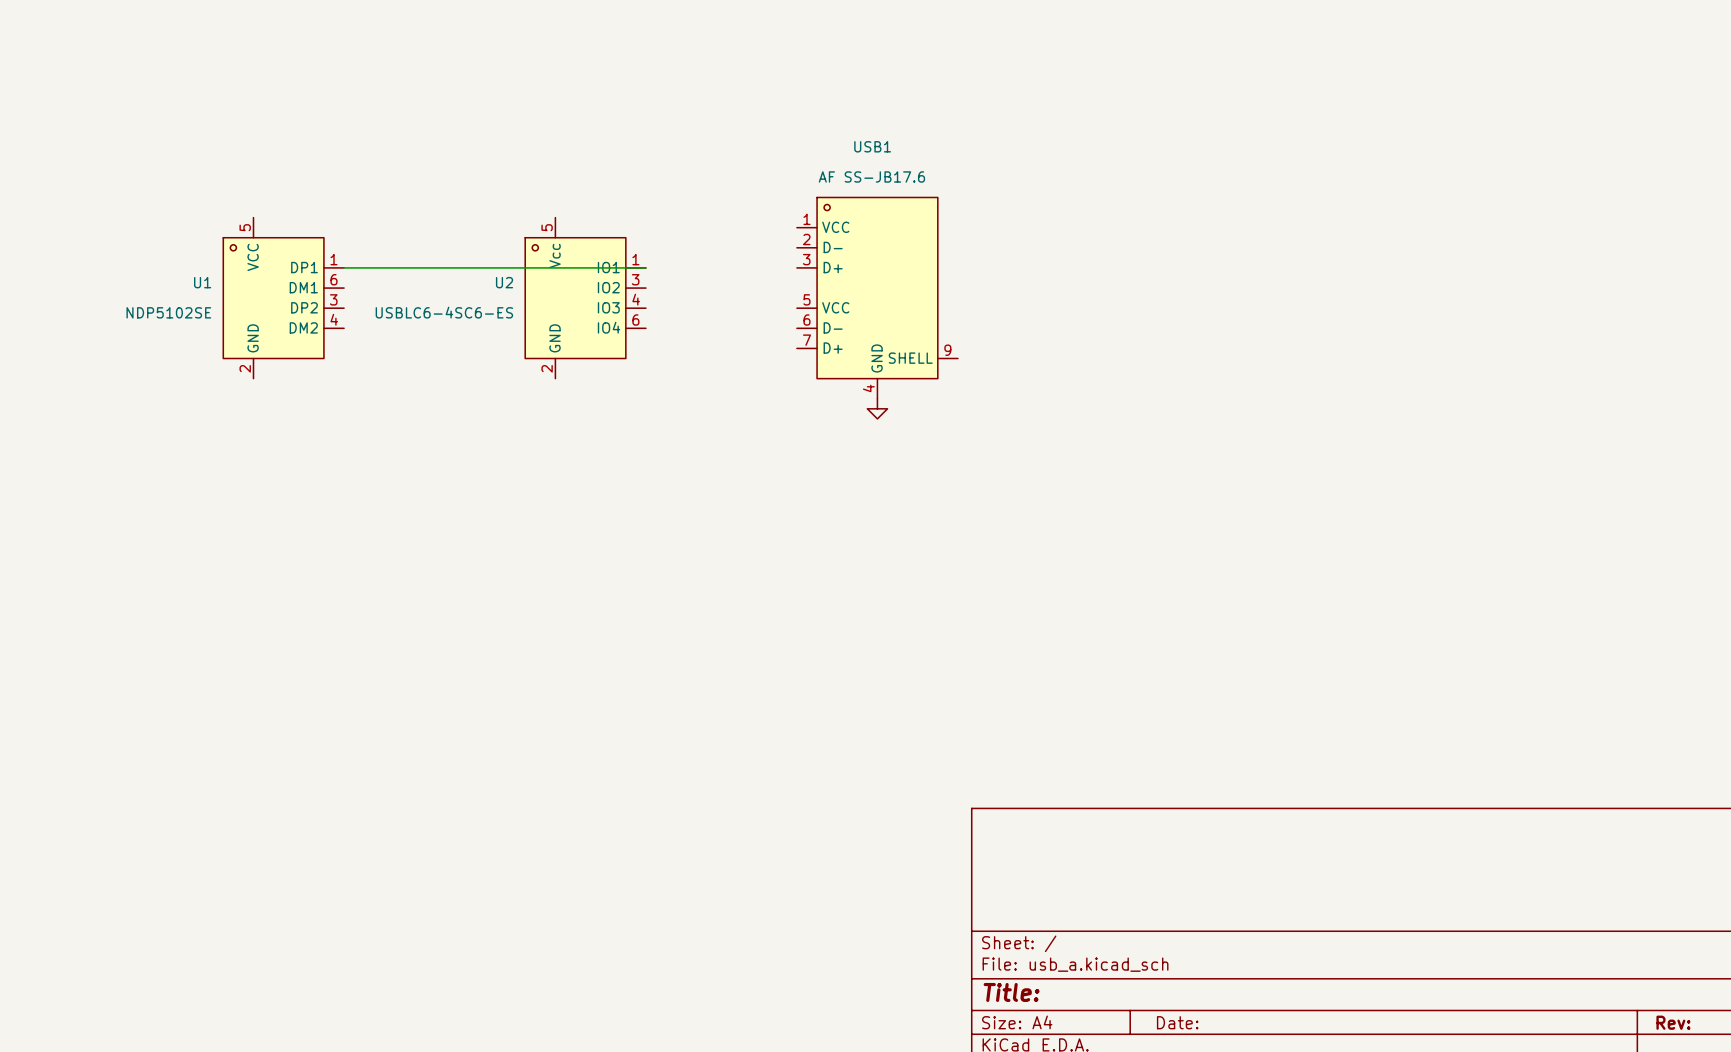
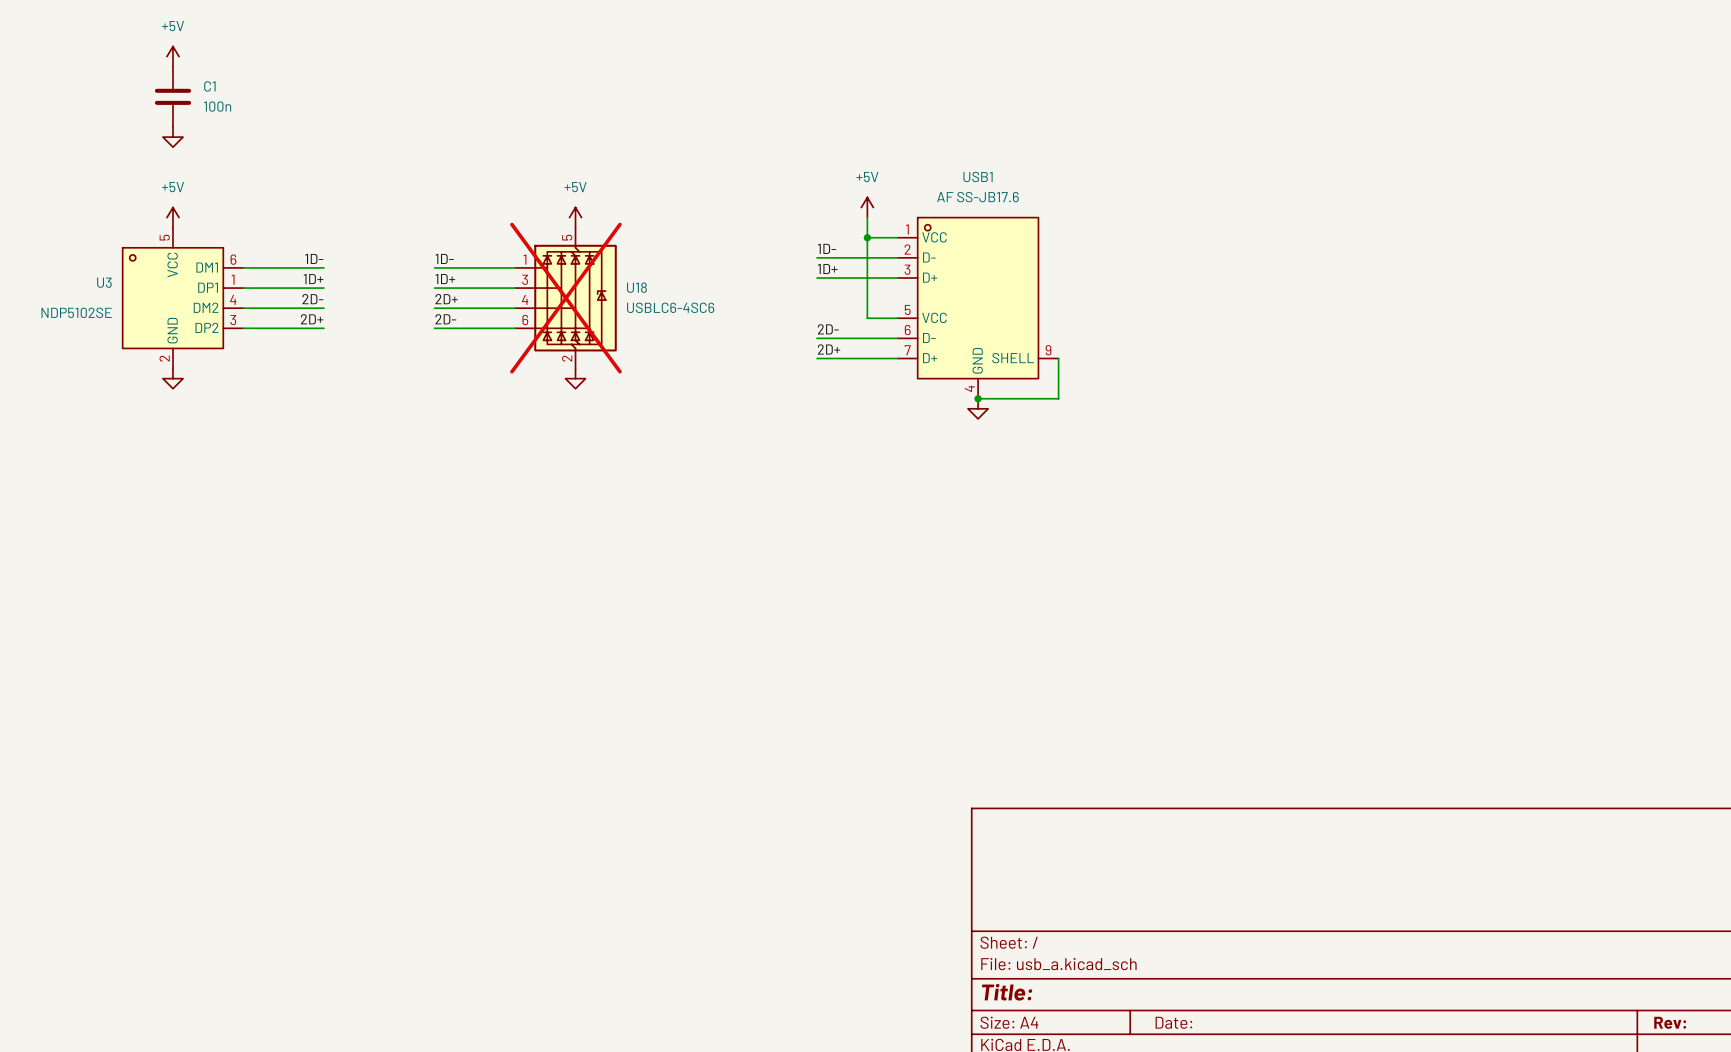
power symbol: none -> +5V (172, 56)
C1: none -> 100n (172, 96)
power symbol: none -> (172, 137)
USB1 name position: USB1 (872, 146) -> USB1 (978, 176)
USB1 symbol: [796, 197, 958, 399] -> [897, 217, 1059, 399]
power symbol: none -> +5V (867, 207)
power symbol: none -> +5V (172, 217)
power symbol: none -> +5V (575, 217)
junction: none -> (867, 237)
label: none -> 1D- (826, 248)
label: none -> 1D- (314, 258)
label: none -> 1D- (444, 258)
wire: (344, 267) (434, 267) -> none
label: none -> 1D+ (827, 269)
label: none -> 1D+ (313, 279)
label: none -> 1D+ (445, 279)
wire: none -> (434, 288) (515, 288)
U3: none -> NDP5102SE (183, 298)
U1: NDP5102SE (283, 298) -> none
U18: none -> USBLC6-4SC6 (565, 298)
U2: USBLC6-4SC6-ES (585, 298) -> none
label: none -> 2D- (312, 299)
label: none -> 2D+ (446, 299)
wire: none -> (434, 308) (515, 308)
label: none -> 2D+ (312, 319)
label: none -> 2D- (445, 319)
wire: none -> (434, 328) (515, 328)
label: none -> 2D- (828, 329)
label: none -> 2D+ (829, 349)
wire: none -> (1058, 358) (1058, 398) (978, 398)
power symbol: none -> (172, 378)
power symbol: none -> (575, 378)
junction: none -> (978, 398)
power symbol position: (877, 408) -> (978, 408)

